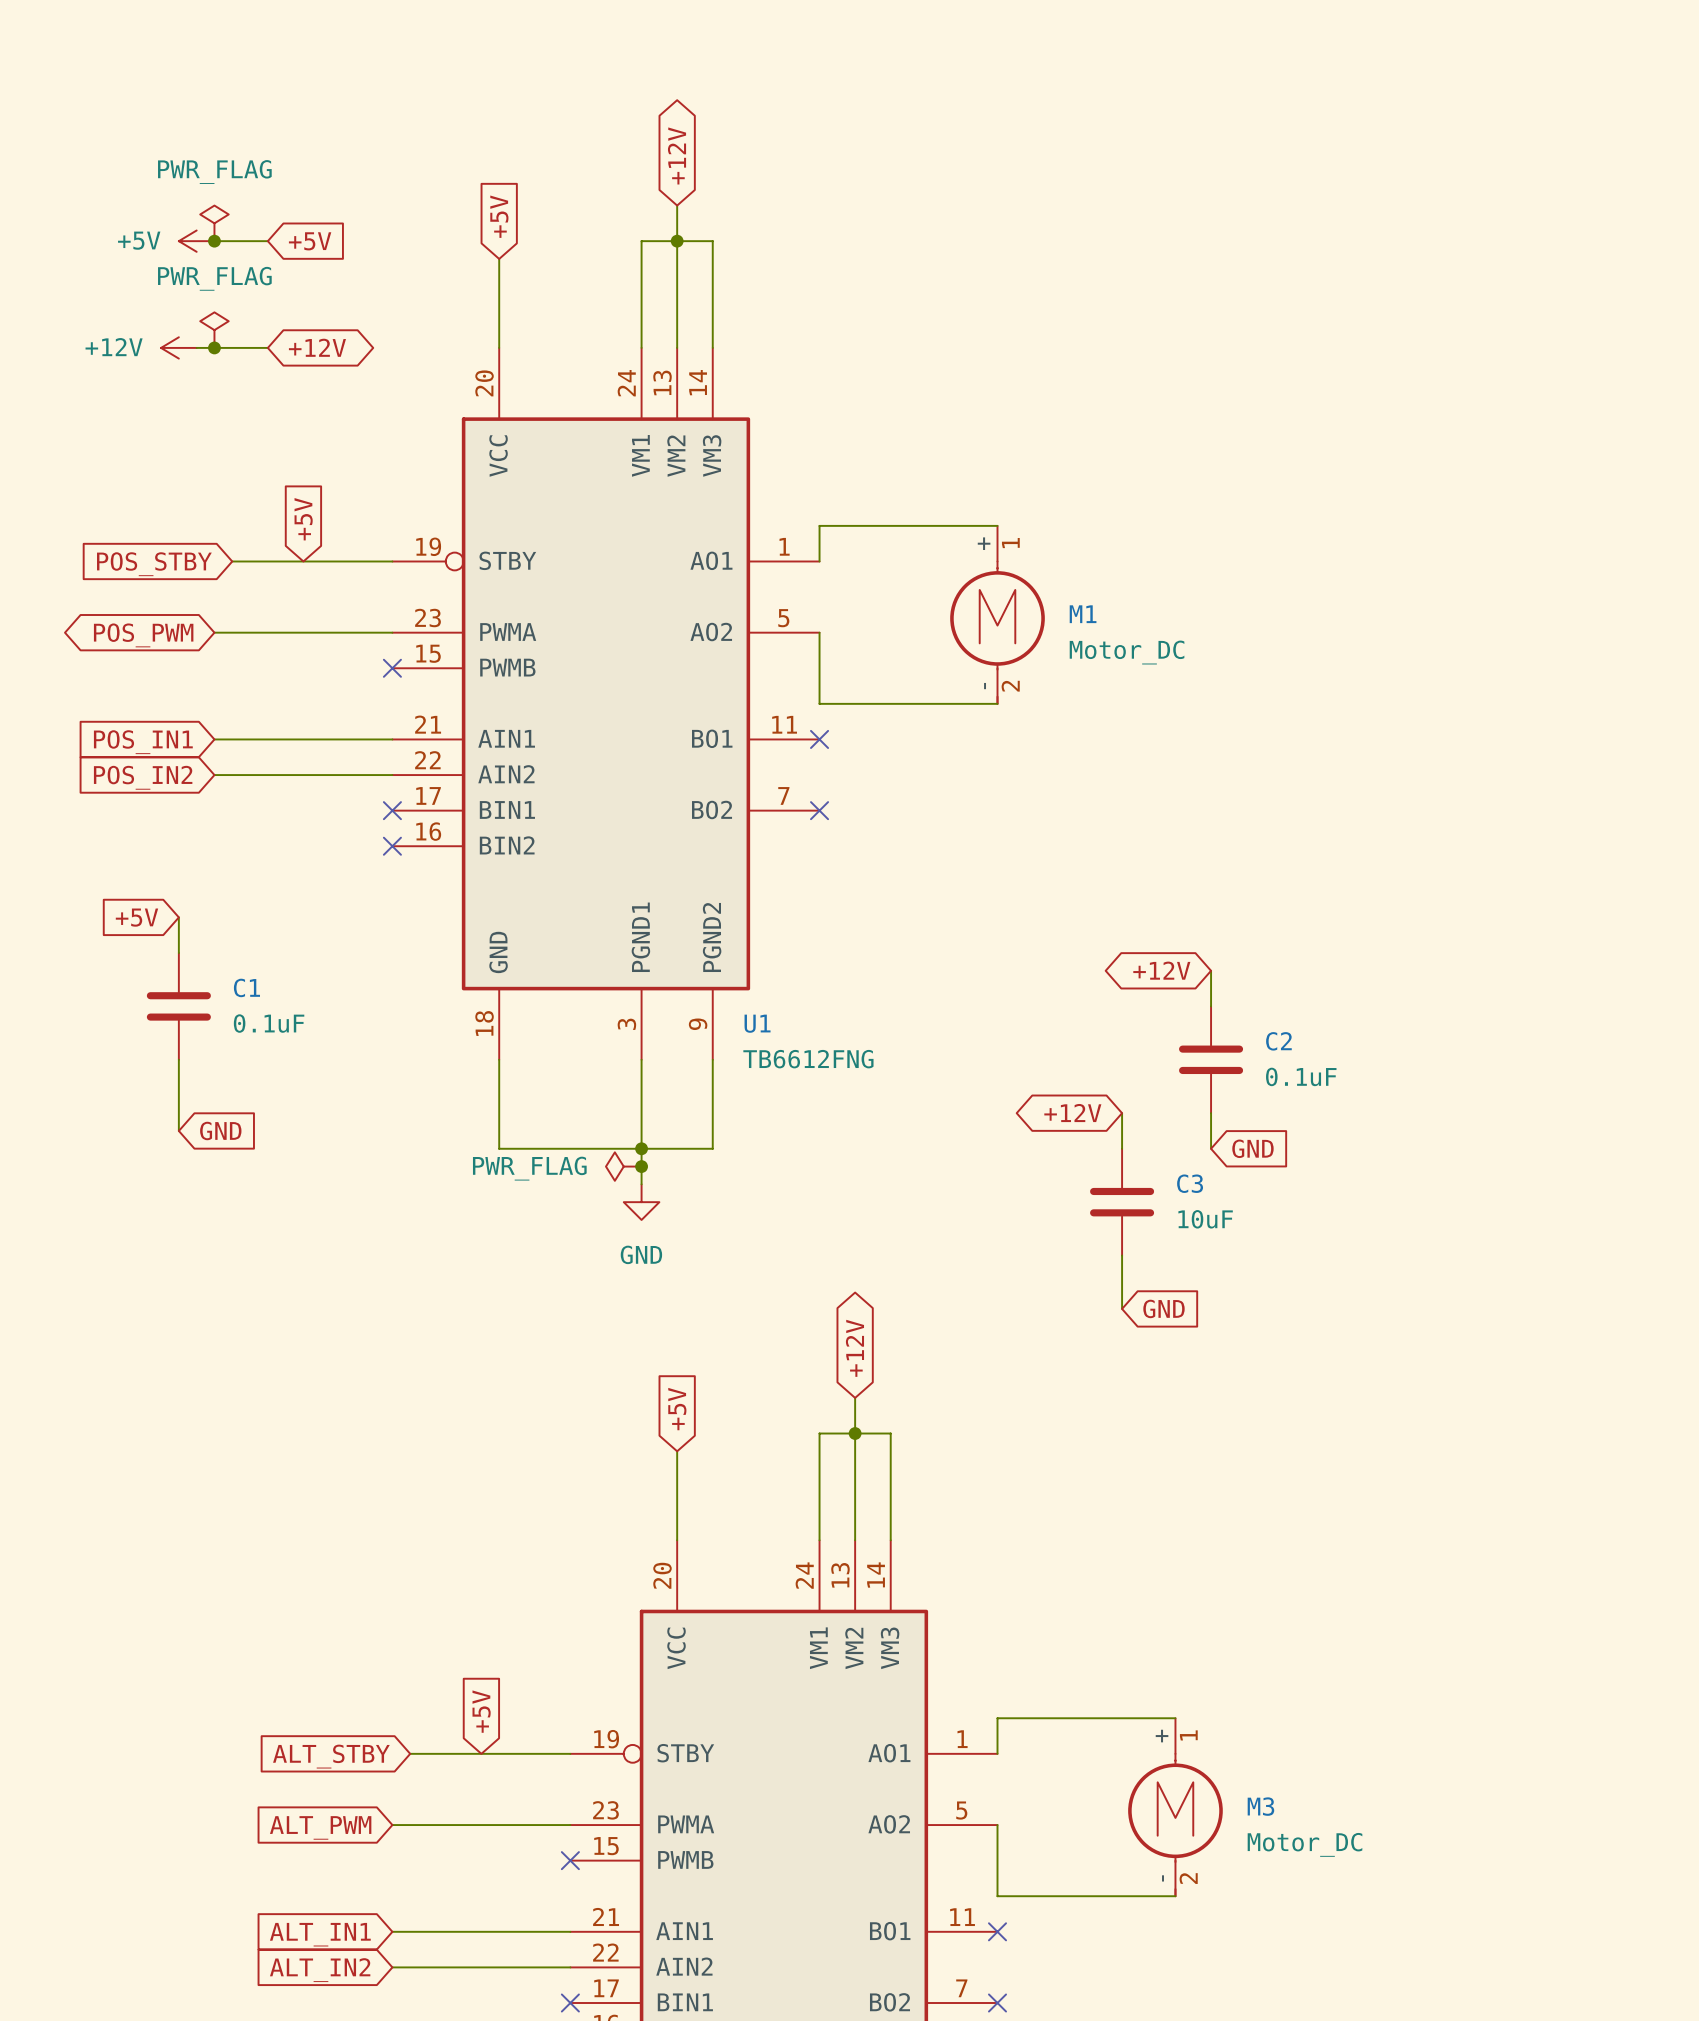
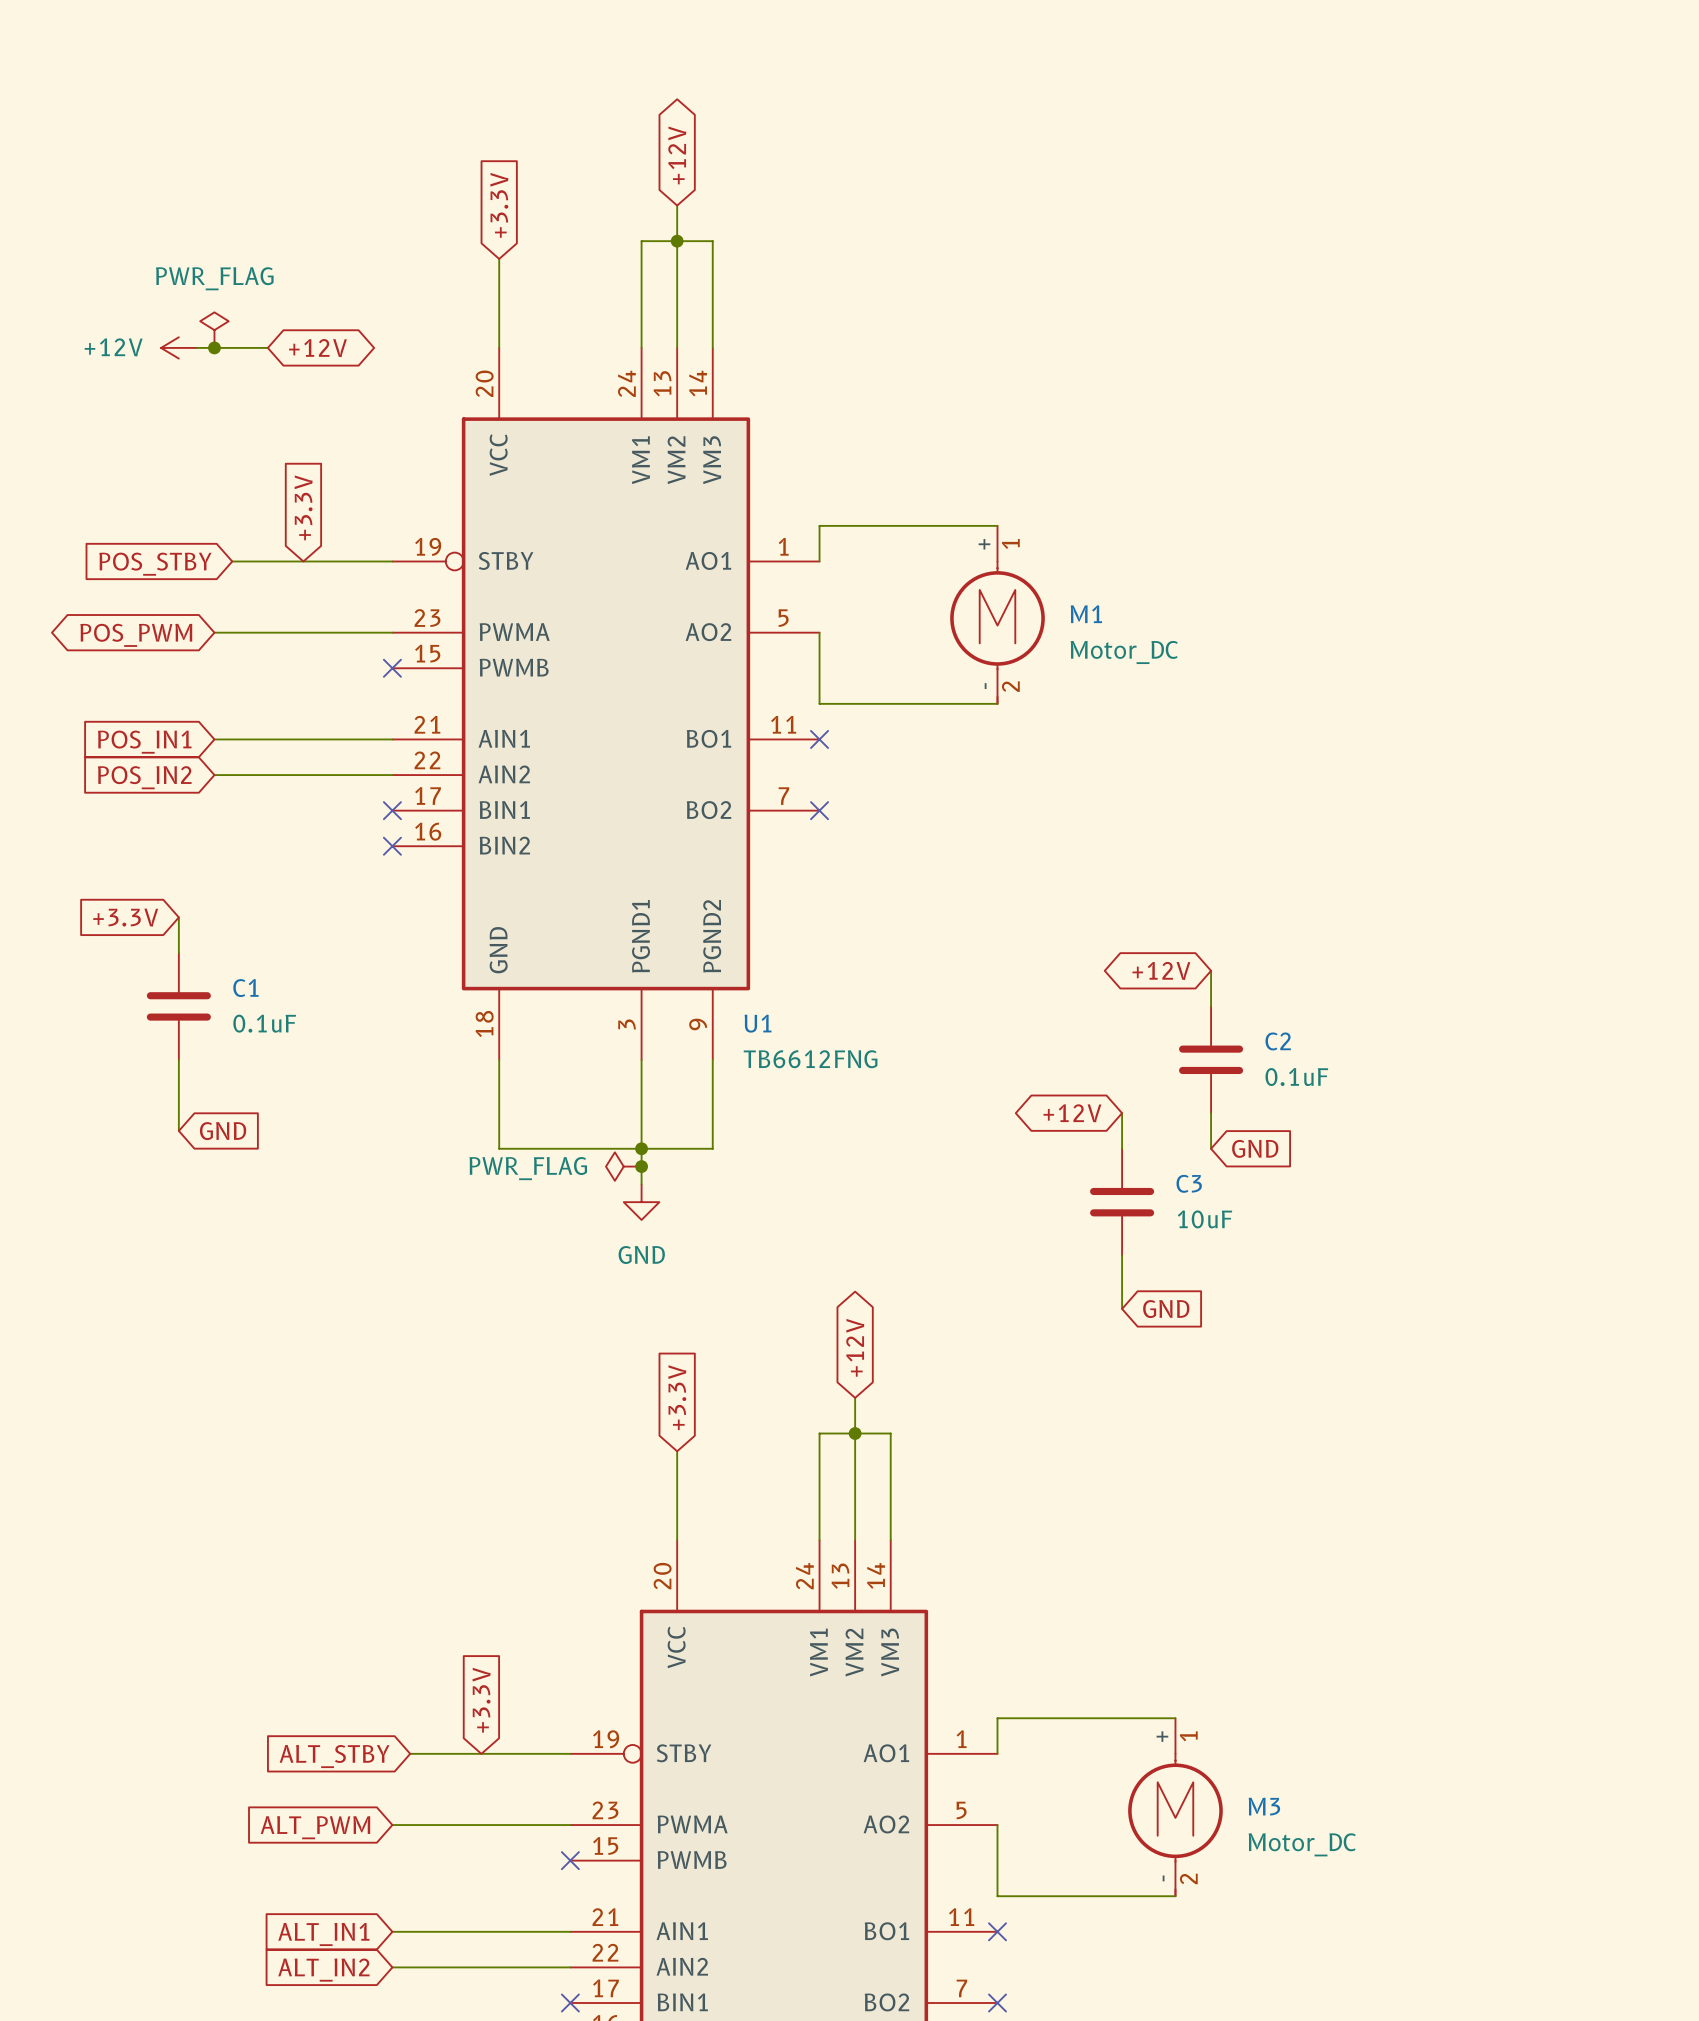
global label: +5V (499, 216) -> +3.3V (499, 205)
power symbol: PWR_FLAG (214, 223) -> none
power symbol: +5V (196, 241) -> none
wire: (214, 241) (267, 241) -> none
junction: (214, 241) -> none
global label: +5V (310, 241) -> none
global label: +5V (303, 519) -> +3.3V (303, 507)
global label: +5V (136, 917) -> +3.3V (125, 917)
global label: +5V (677, 1409) -> +3.3V (677, 1397)
global label: +5V (481, 1711) -> +3.3V (481, 1700)

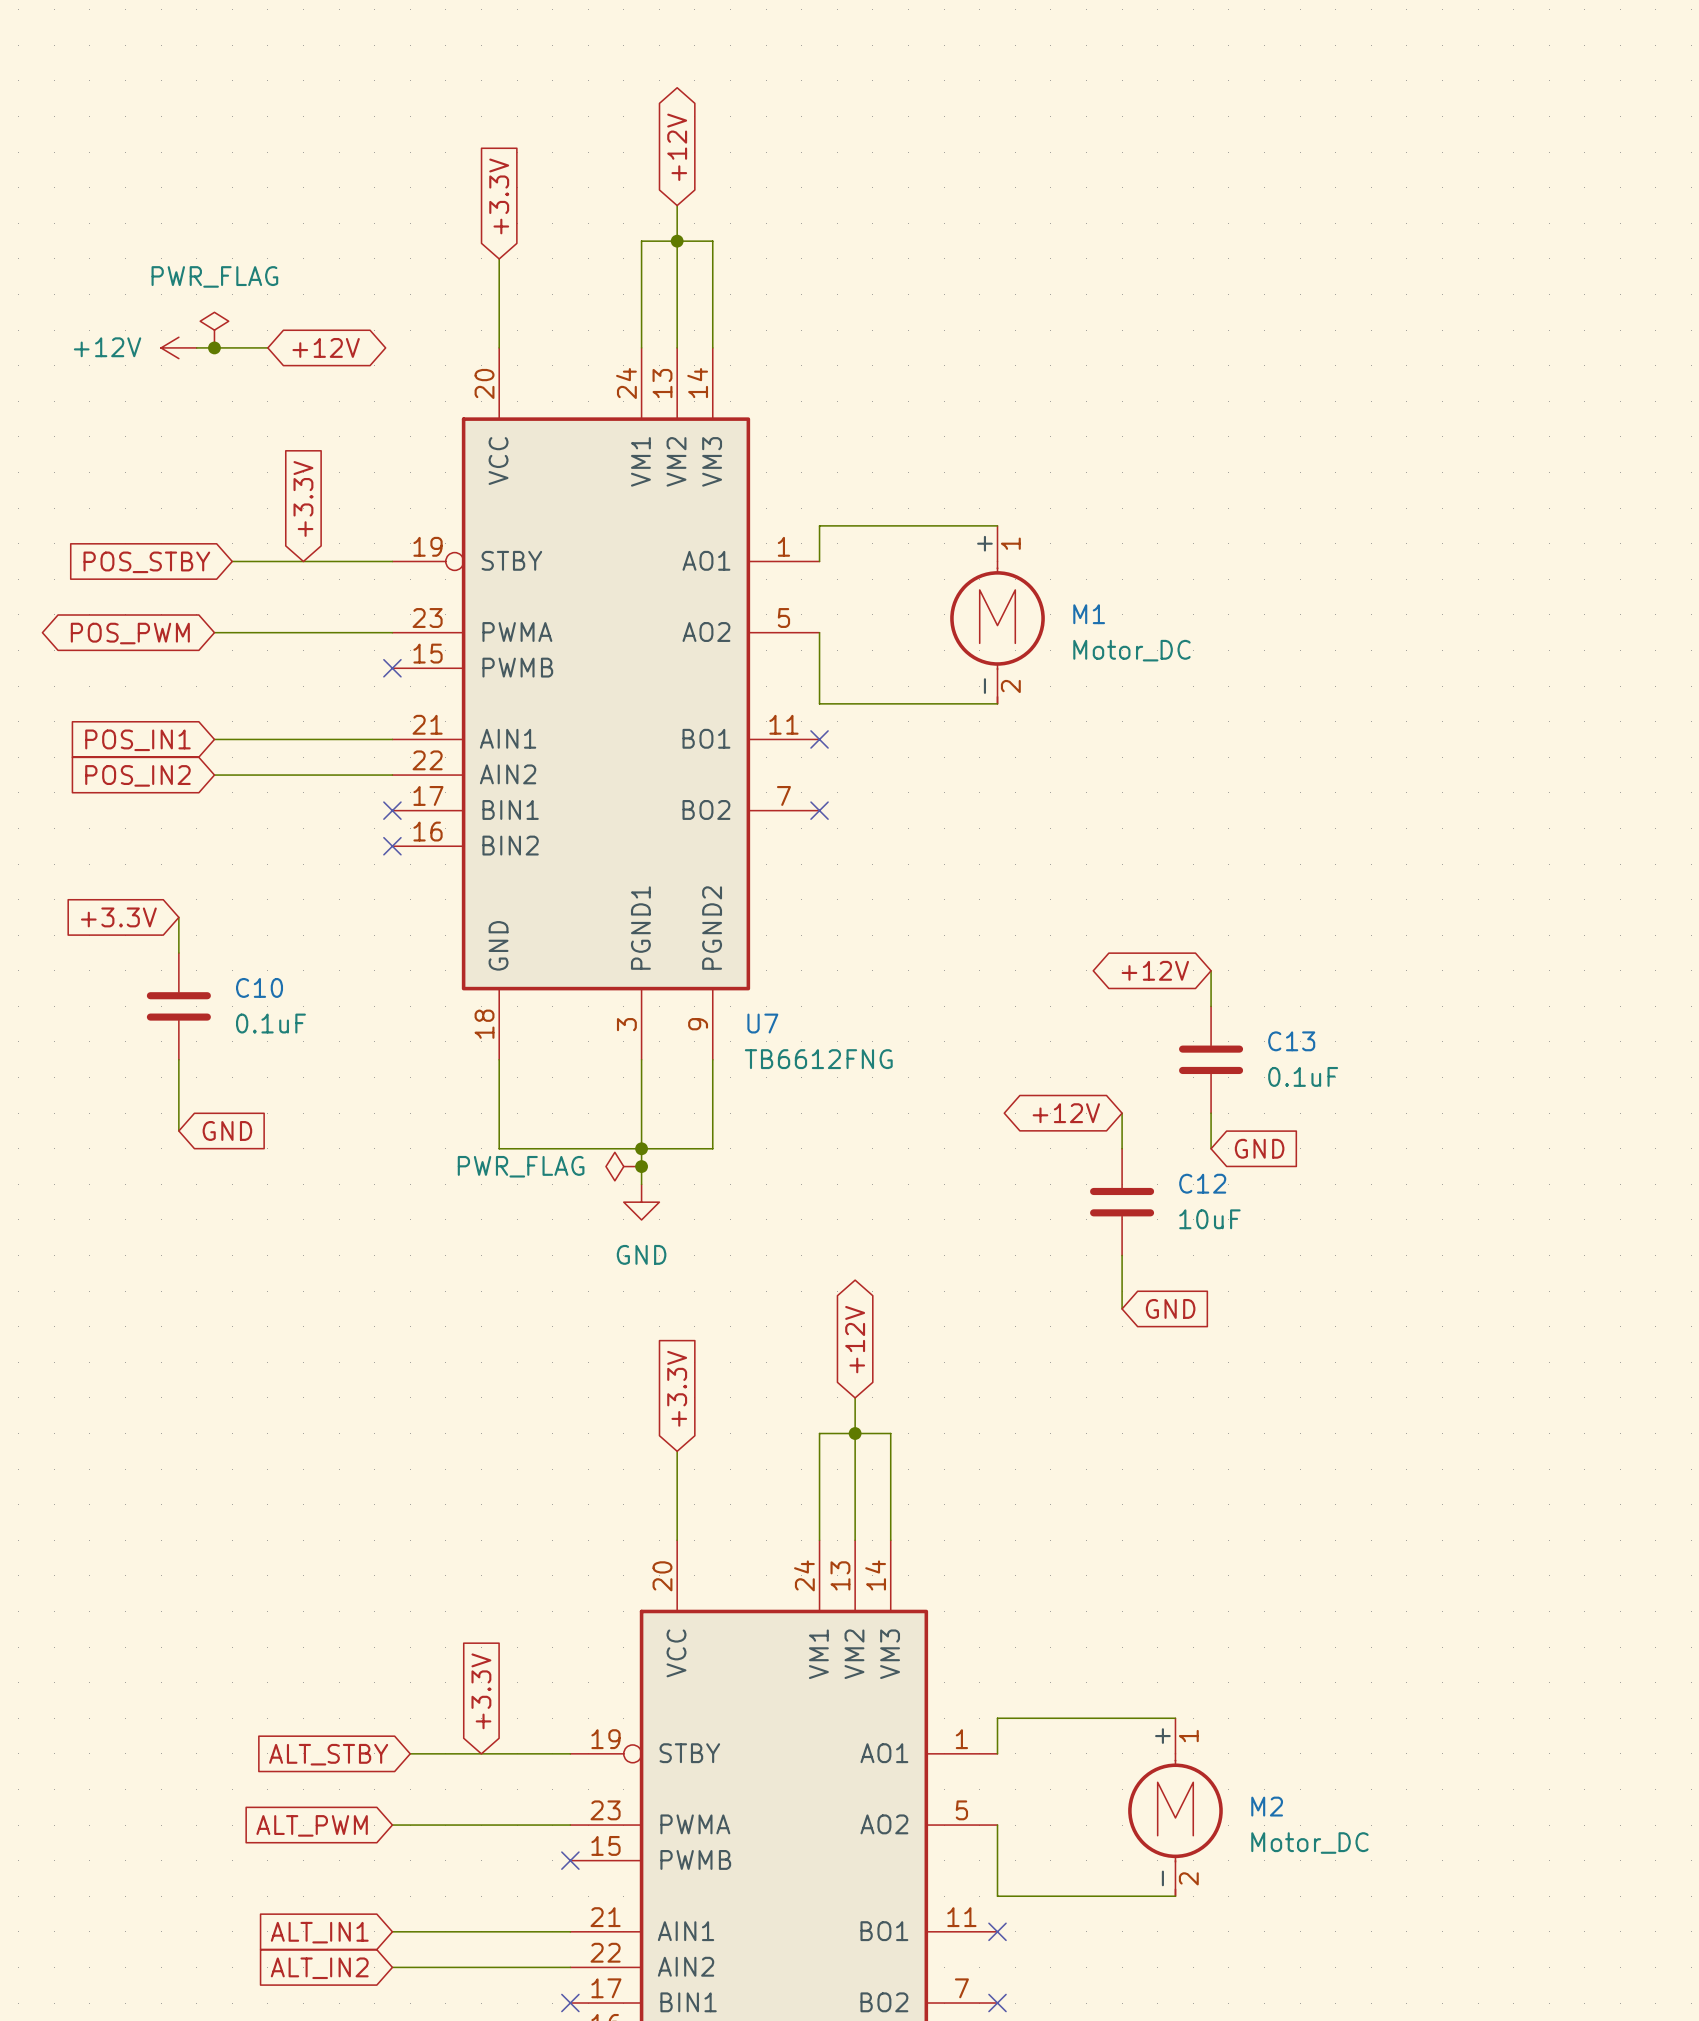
C1 name: C1 (245, 988) -> C10 (259, 987)
U1 name: U1 (758, 1023) -> U7 (762, 1023)
C2 name: C2 (1278, 1041) -> C13 (1291, 1041)
C3 name: C3 (1189, 1183) -> C12 (1202, 1183)
M3 name: M3 (1264, 1806) -> M2 (1267, 1806)

